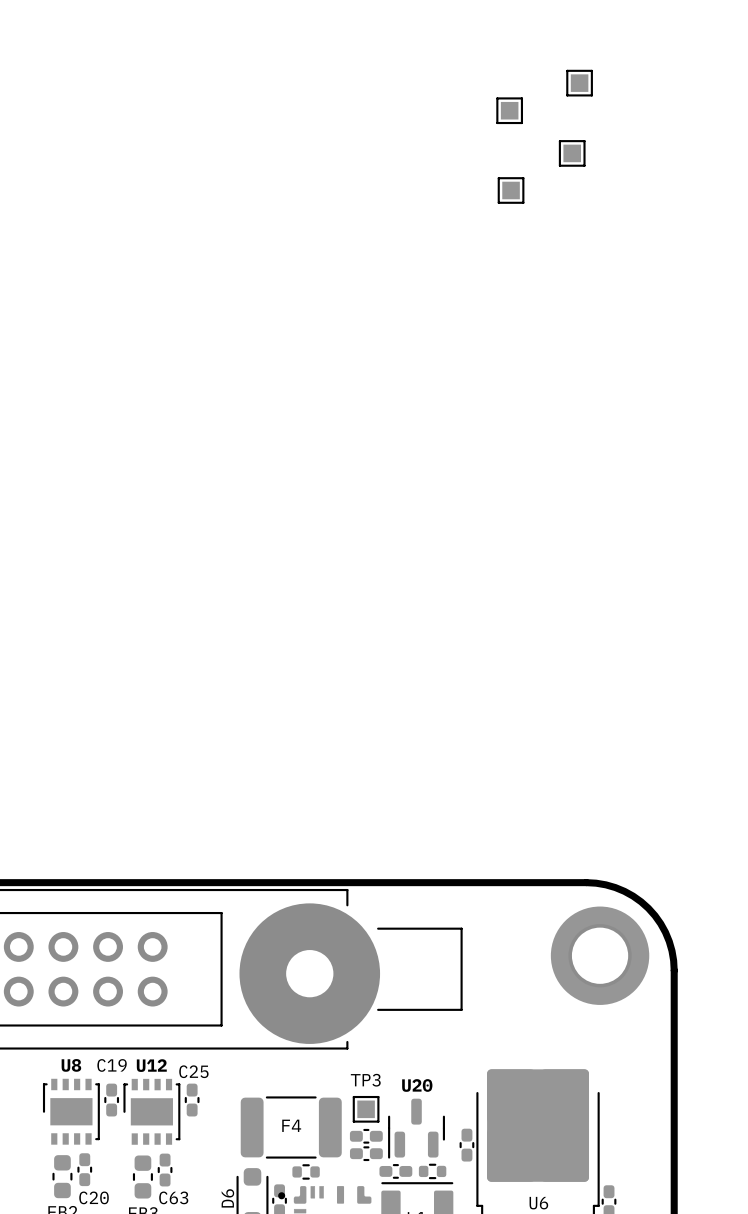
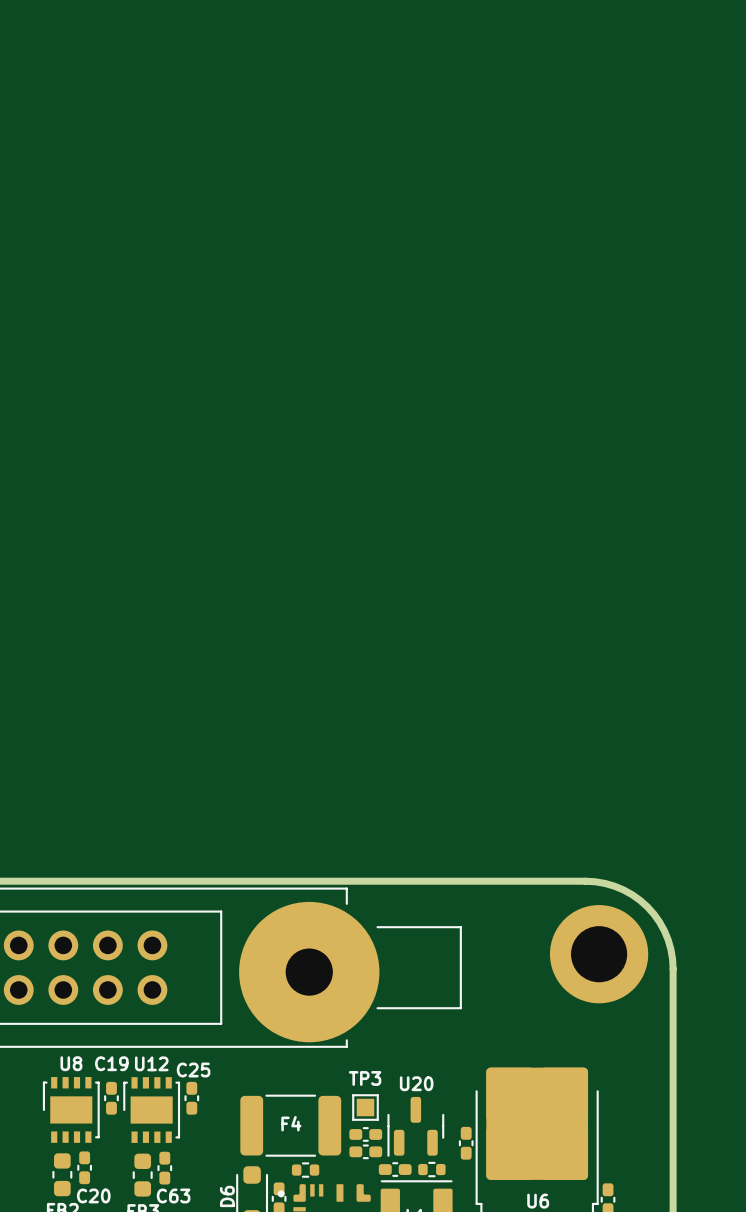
part: (579, 83) -> none
part: (509, 110) -> none
part: (572, 153) -> none
part: (511, 190) -> none

